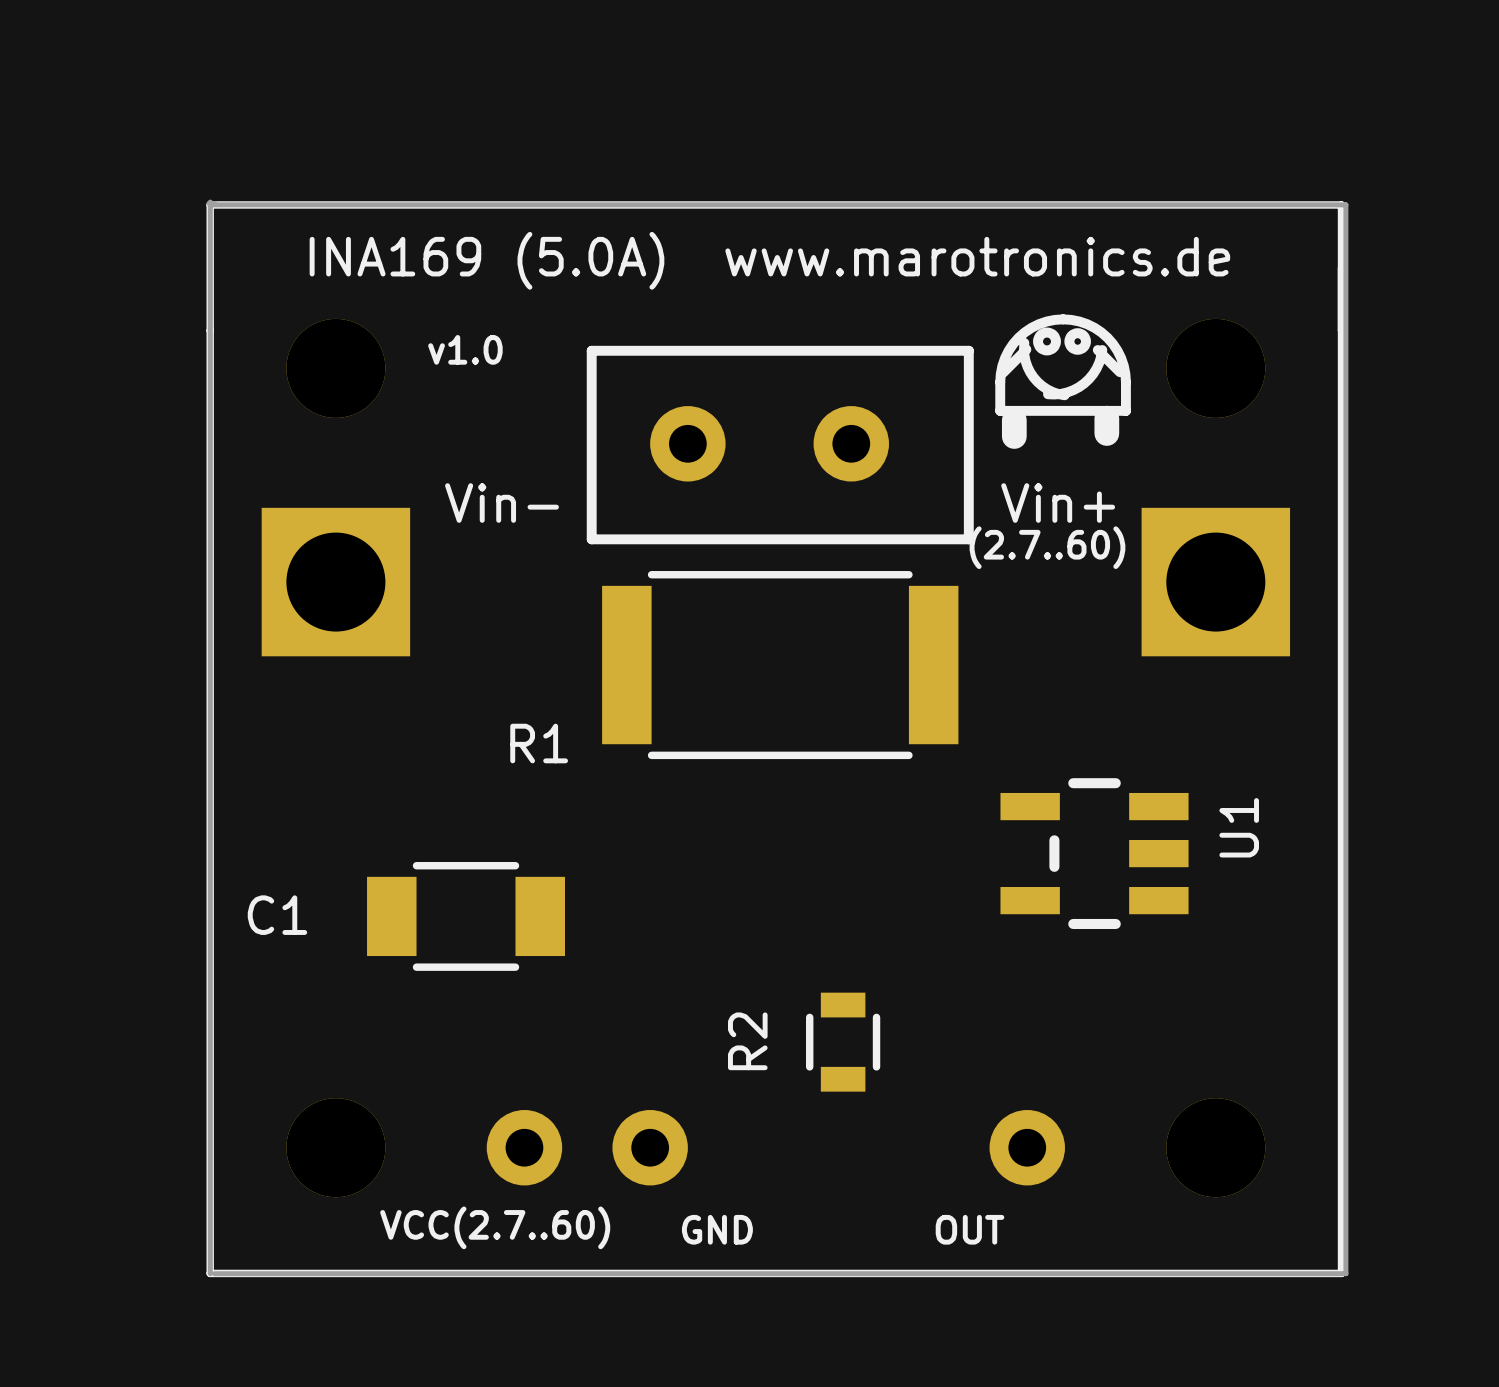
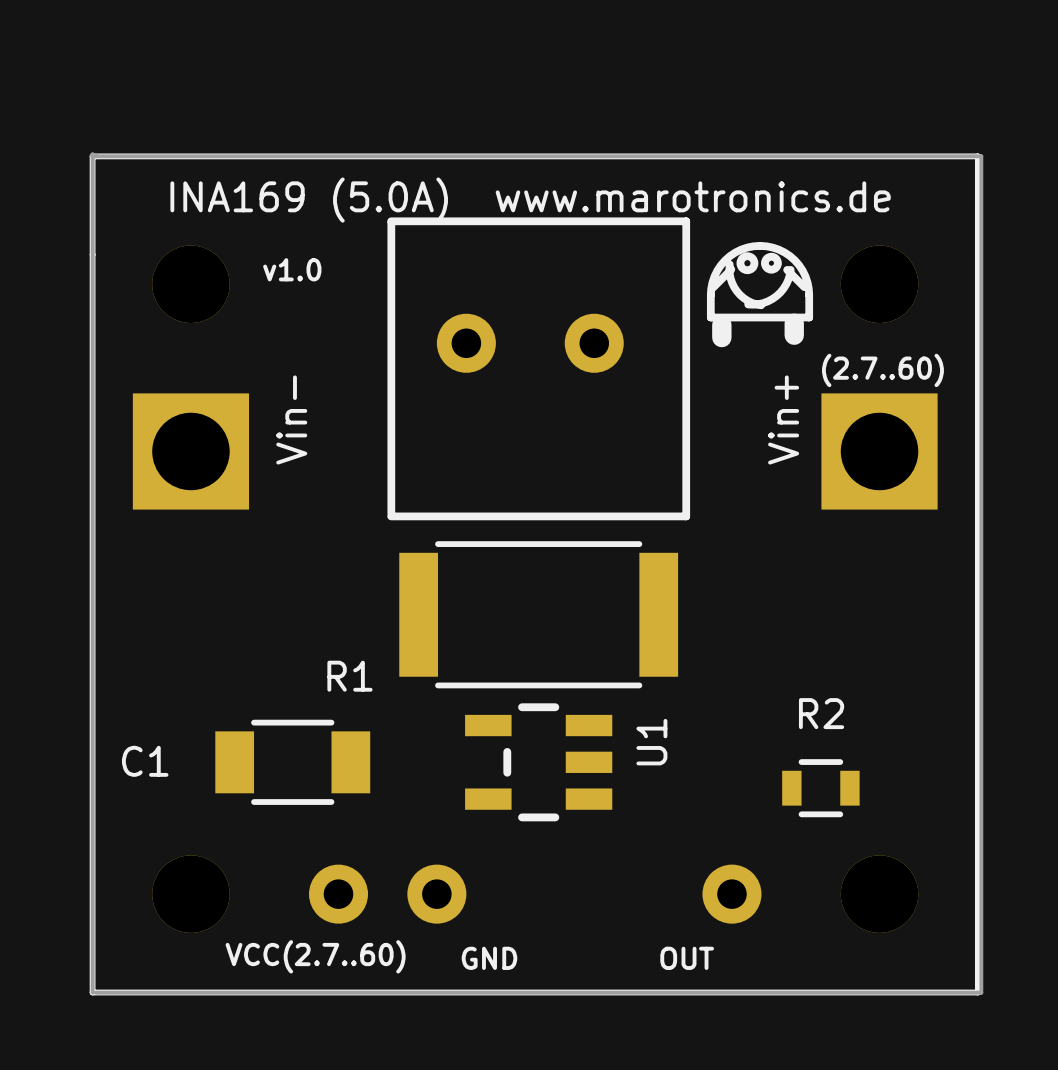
line: none -> (391, 223) (391, 513)
line: (968, 350) (591, 350) (591, 539) (968, 539) -> (686, 270) (686, 221) (391, 221)
text rotation: 0° (502, 503) -> 90° counterclockwise (291, 419)
text rotation: 0° (1058, 503) -> 90° counterclockwise (783, 419)
line: none -> (686, 418) (686, 516) (391, 516)
text position: (2.7..60) (1047, 547) -> (2.7..60) (882, 370)
R1 position: (780, 665) -> (538, 614)
U1 position: (1094, 853) -> (538, 762)
C1 position: (466, 916) -> (292, 762)
R2 rotation: 0° (843, 1042) -> 90° clockwise (820, 788)
R2 position: (843, 1042) -> (820, 788)

